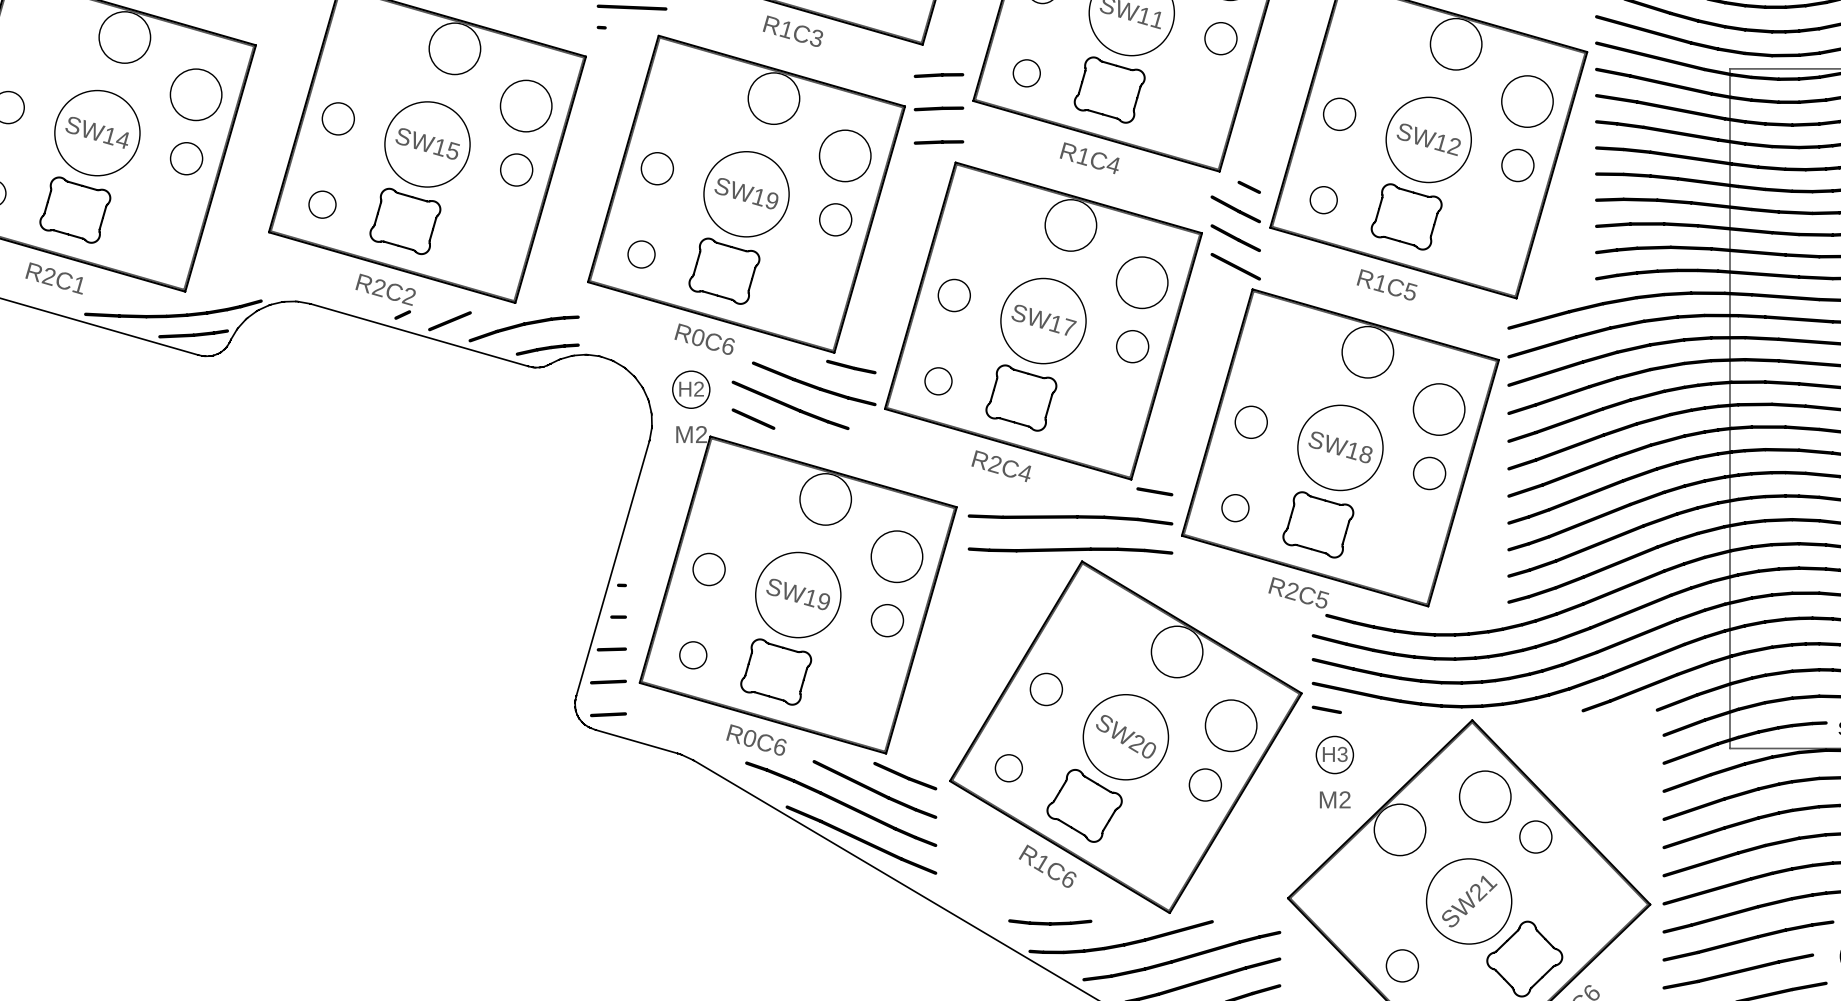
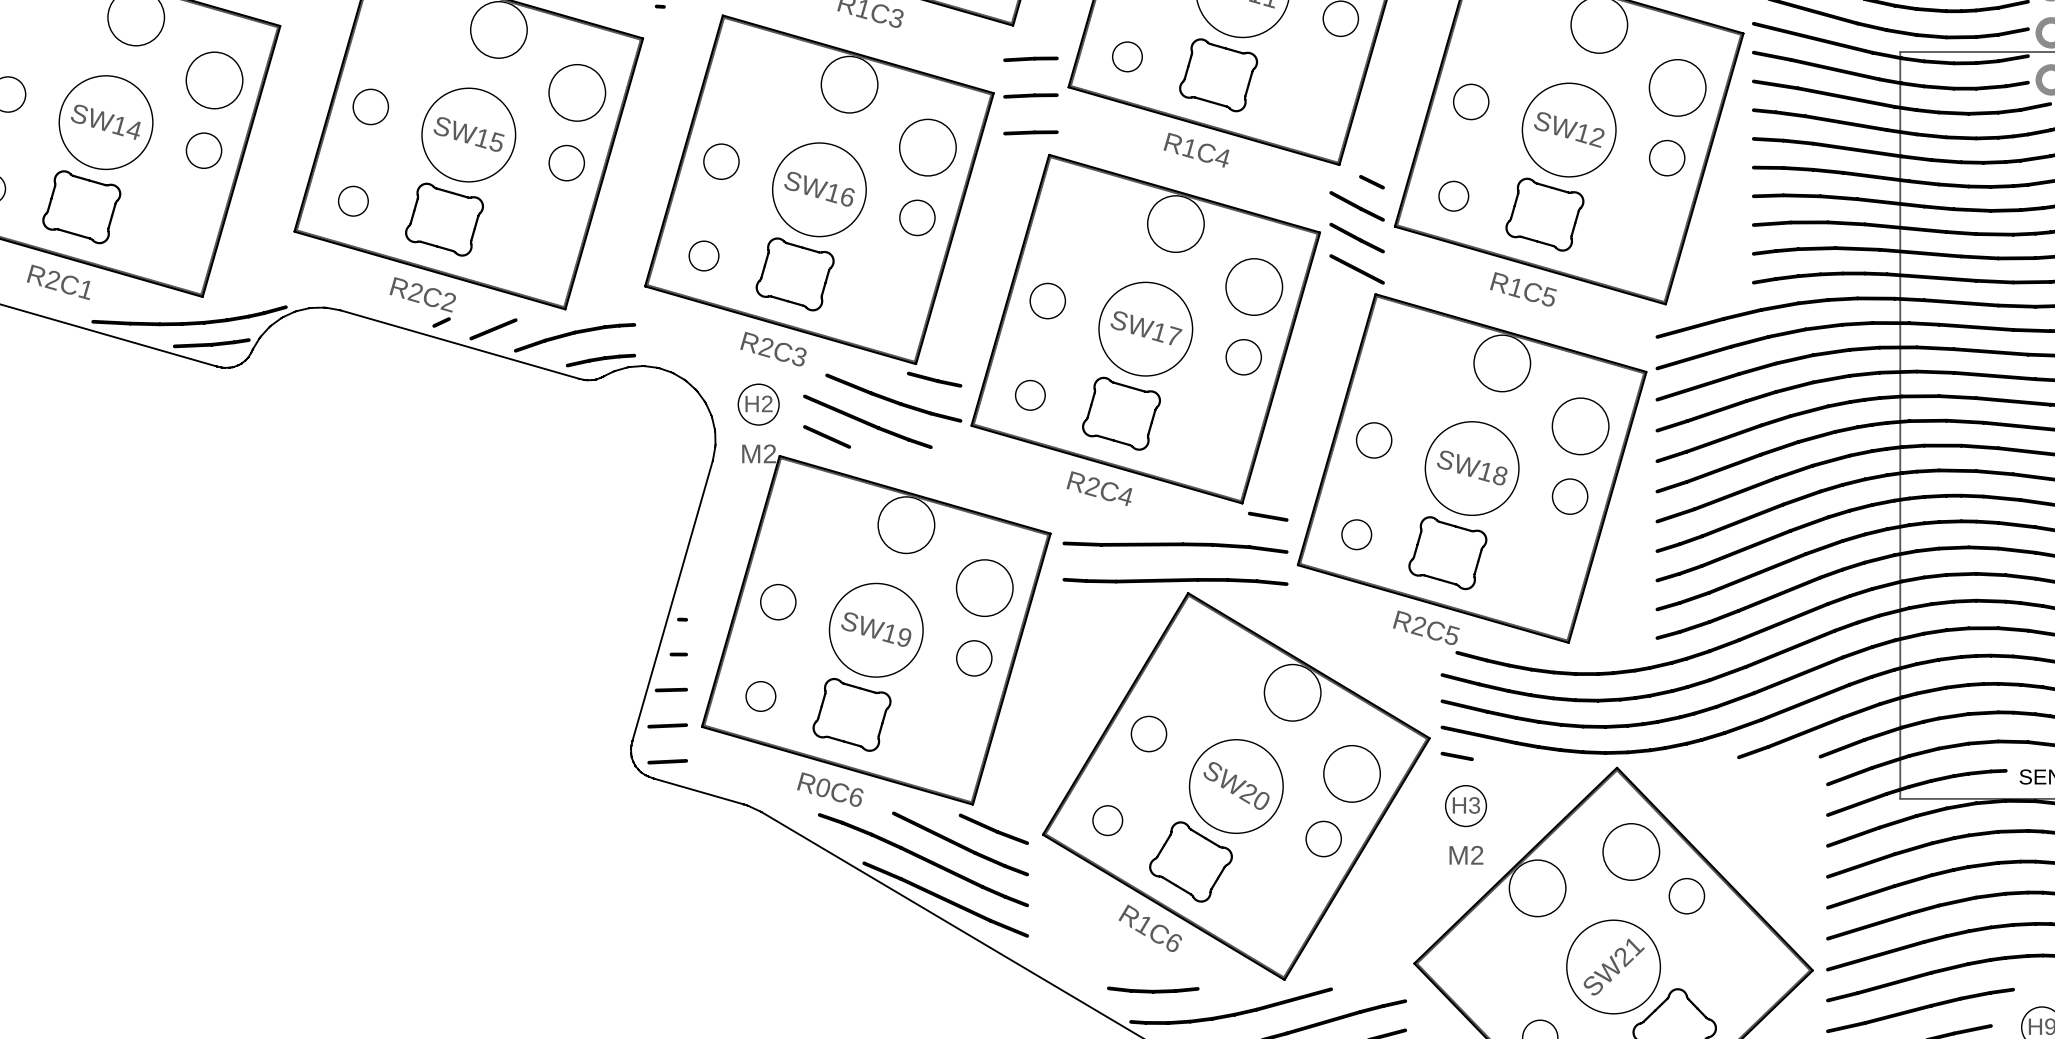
SW19 name: SW19 (746, 193) -> SW16 (819, 189)
SW19 value: R0C6 (704, 339) -> R2C3 (773, 349)

